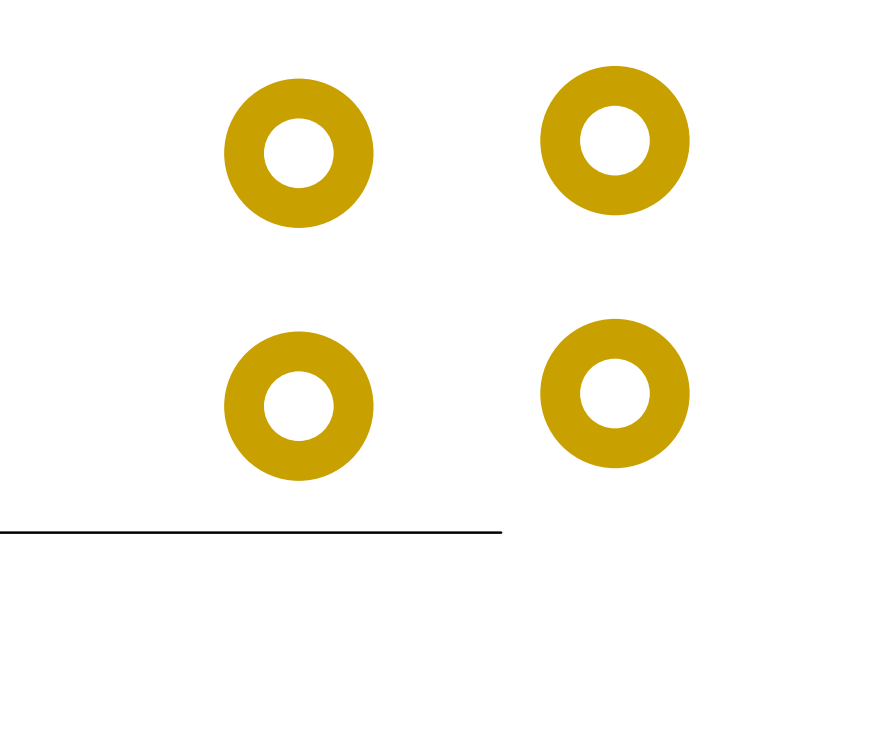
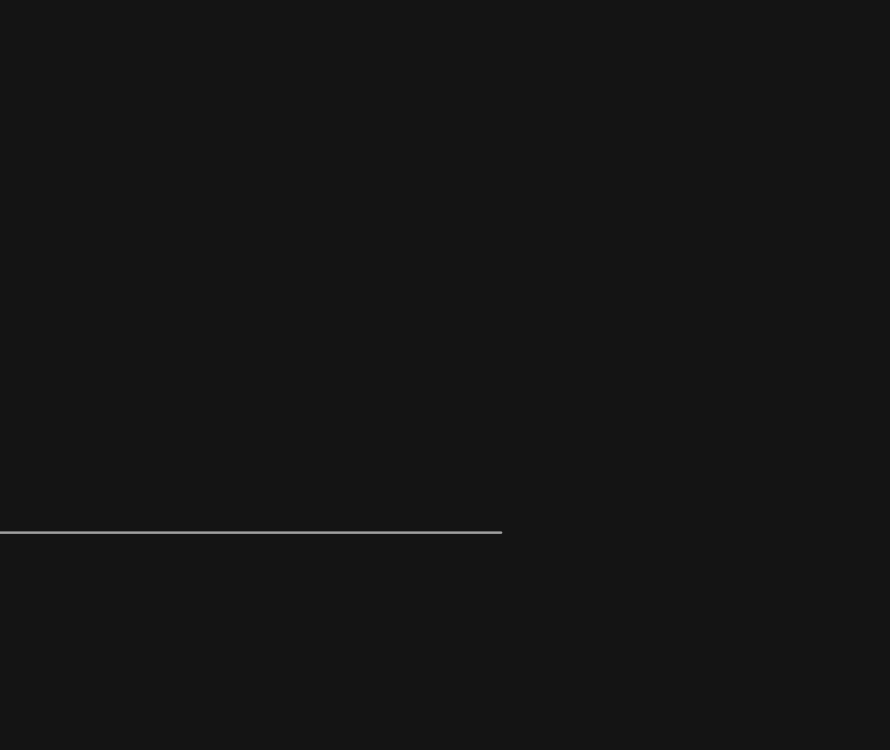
part: (614, 267) -> none
part: (298, 279) -> none

